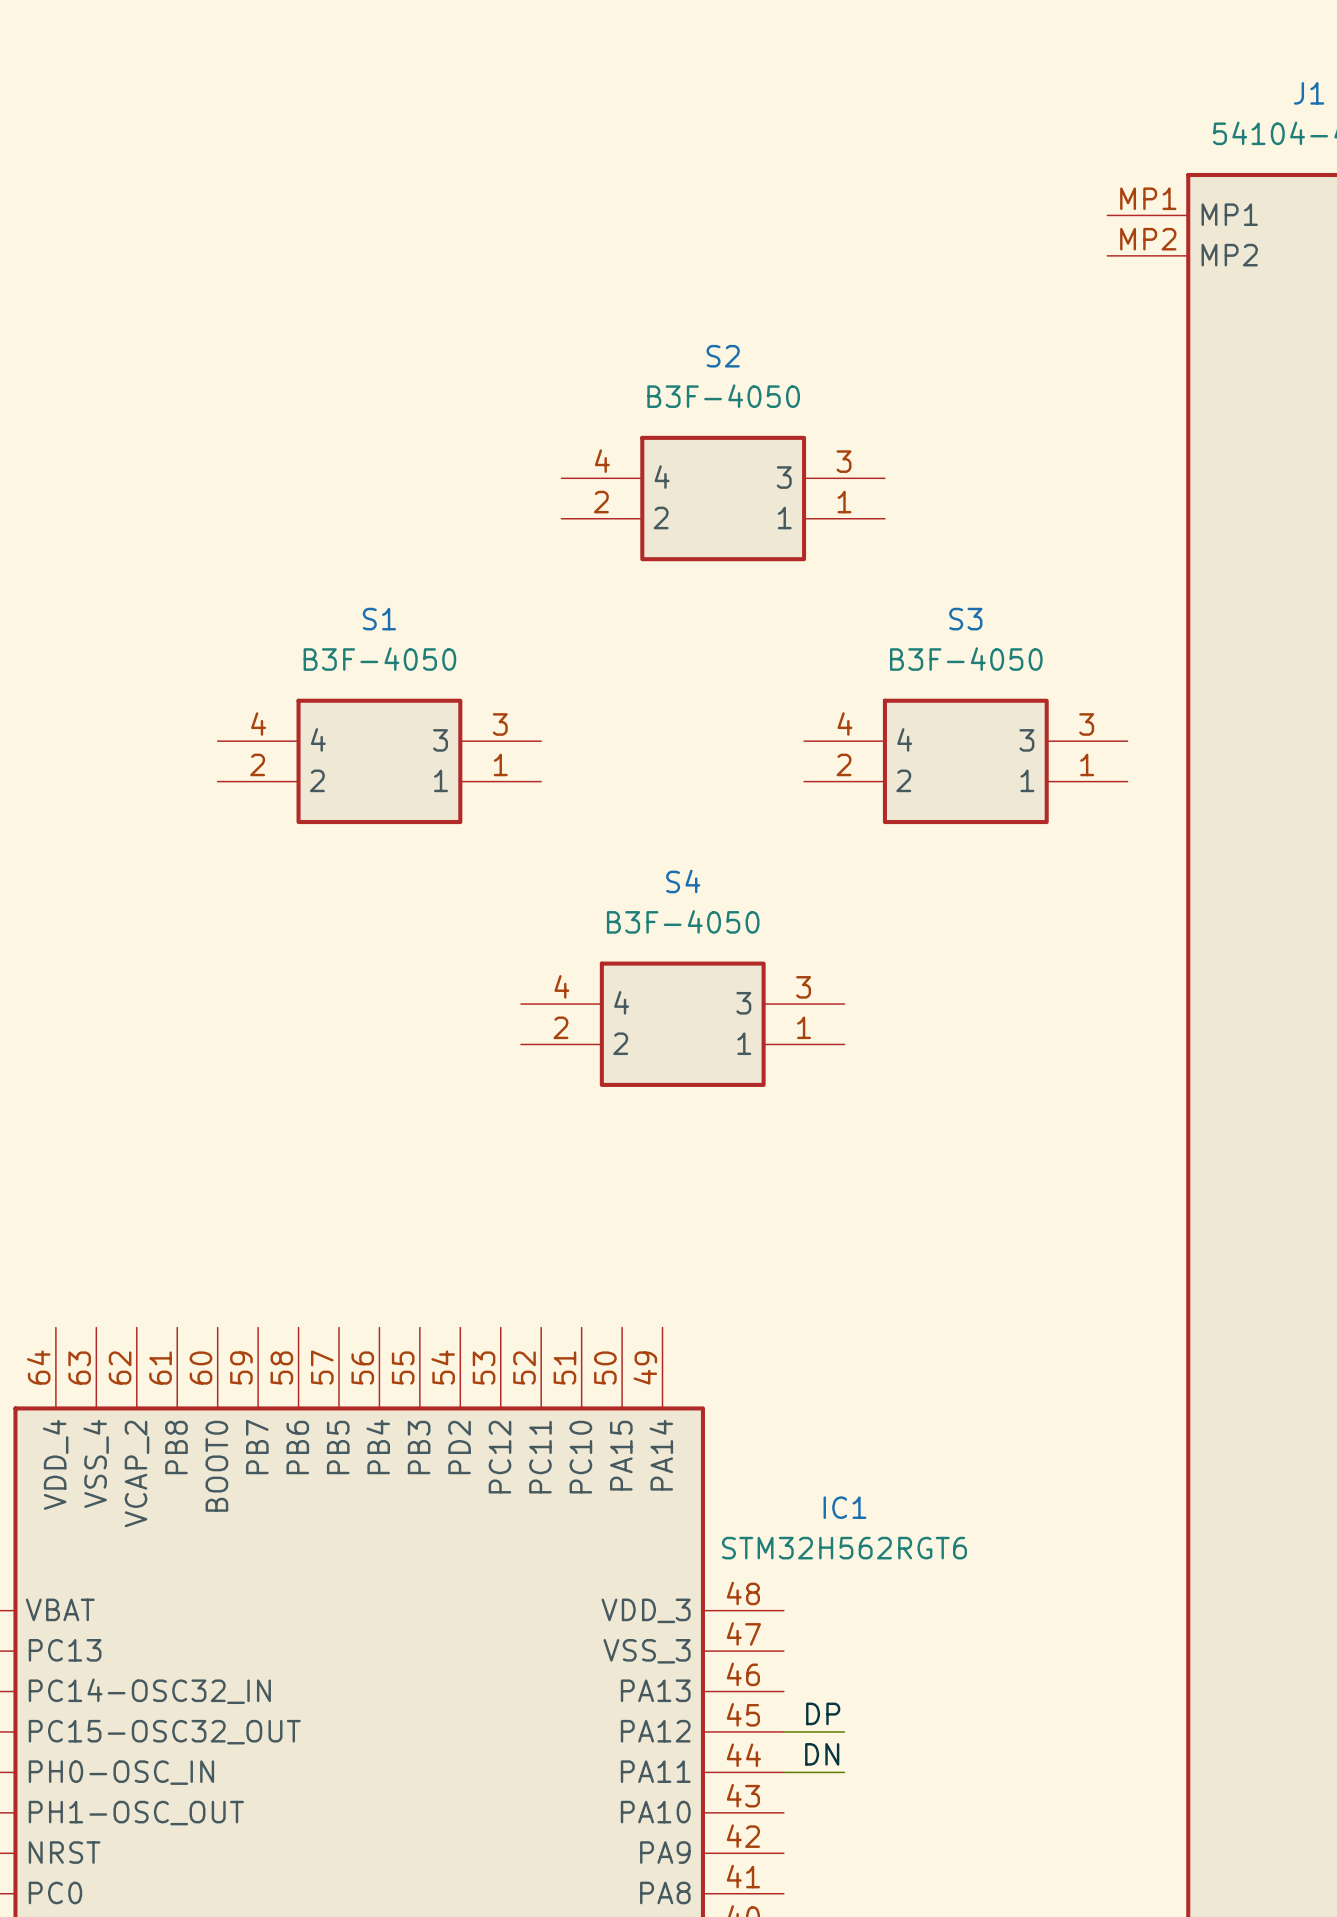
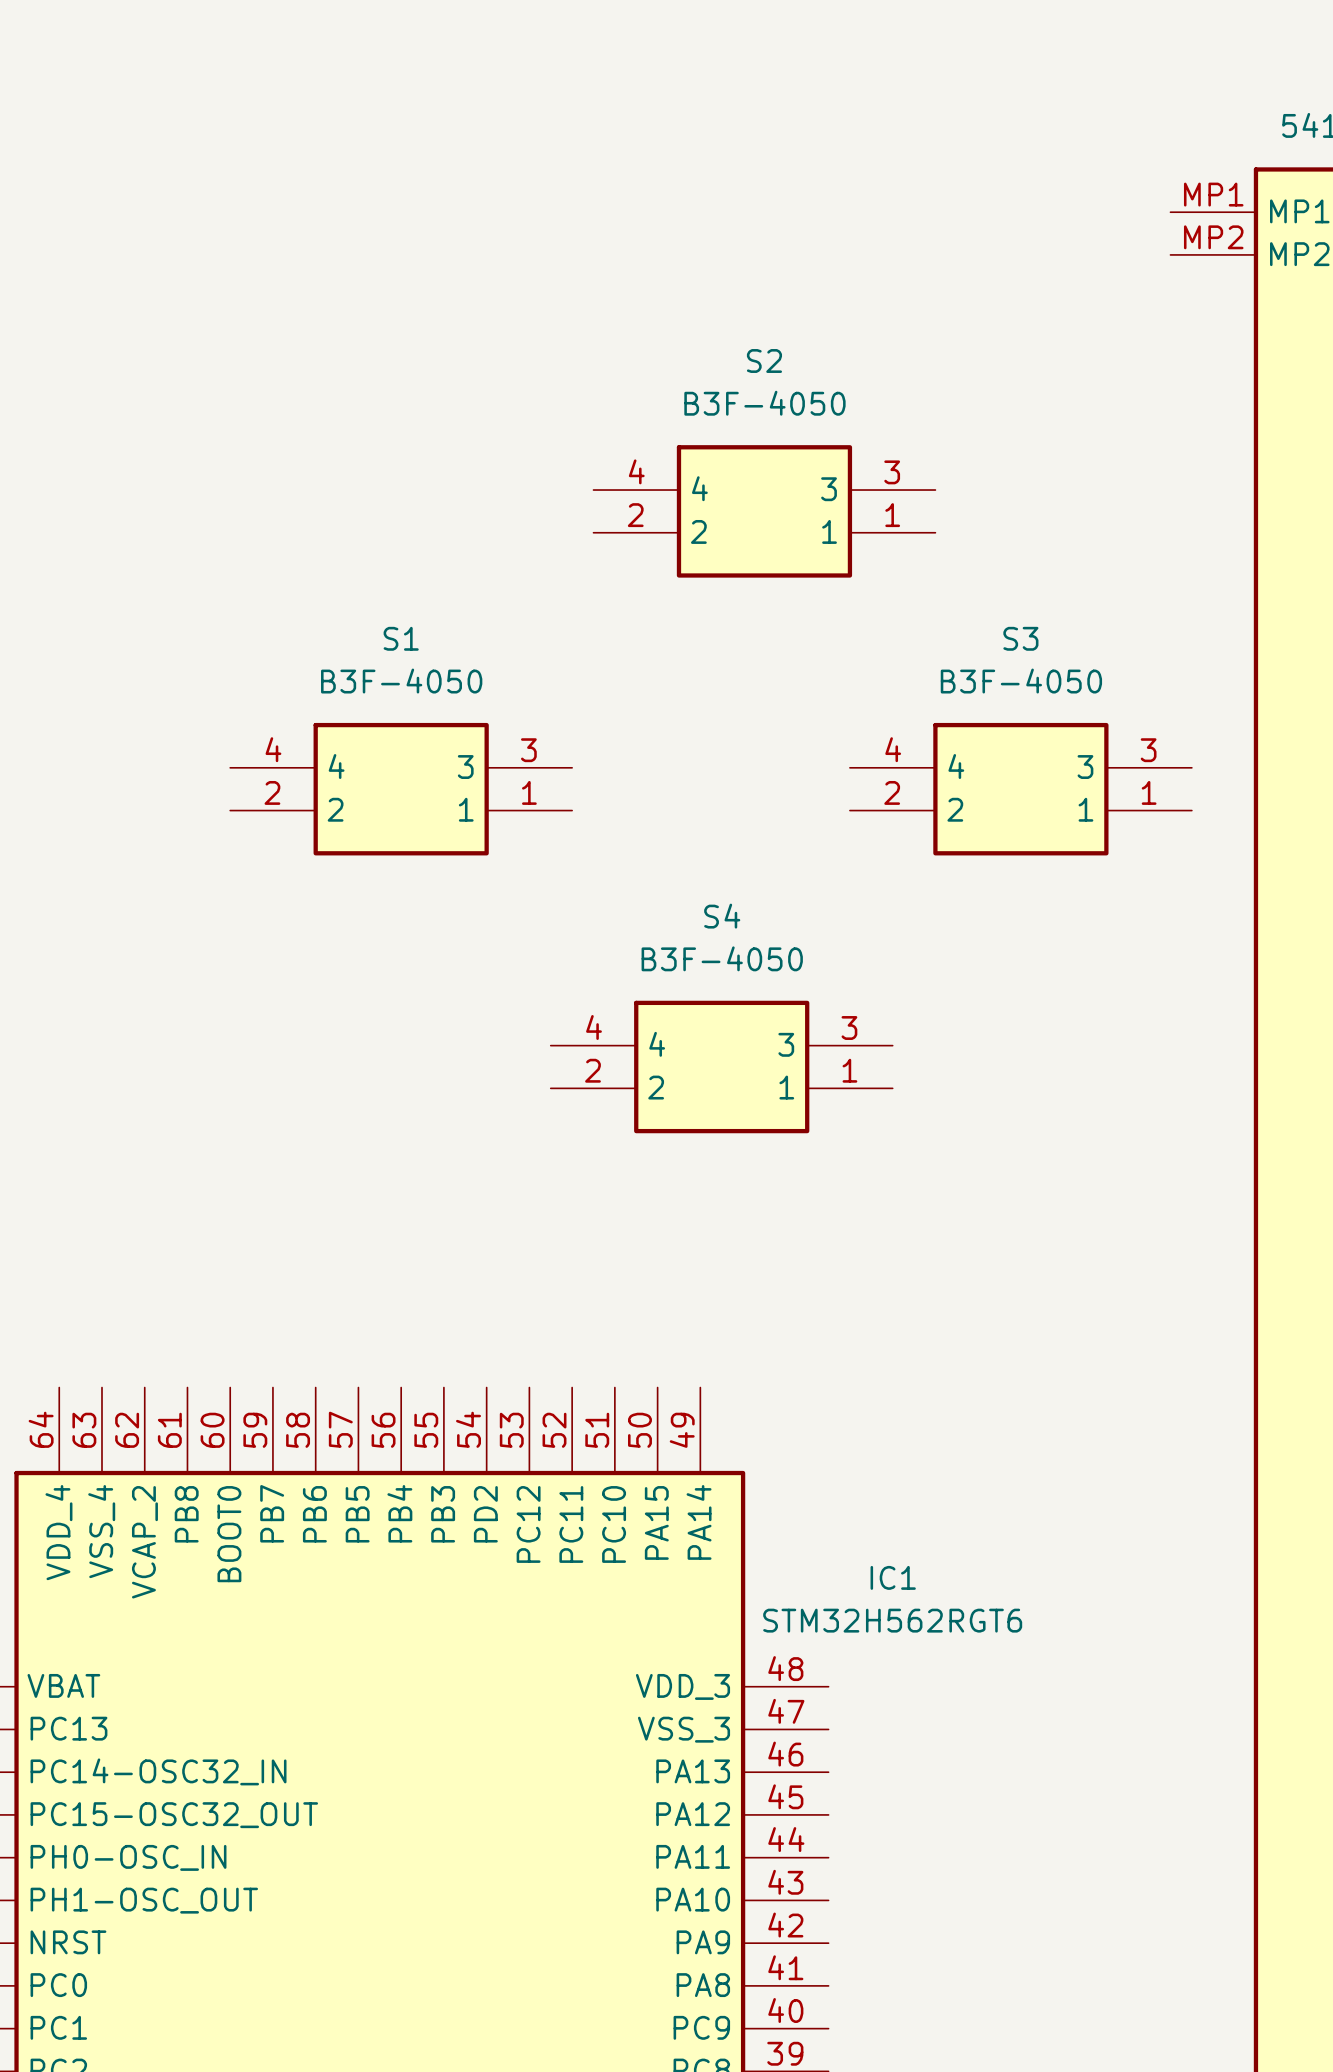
label: DP (823, 1713) -> none
wire: (783, 1731) (844, 1731) -> none
label: DN (822, 1754) -> none
wire: (783, 1772) (844, 1772) -> none

